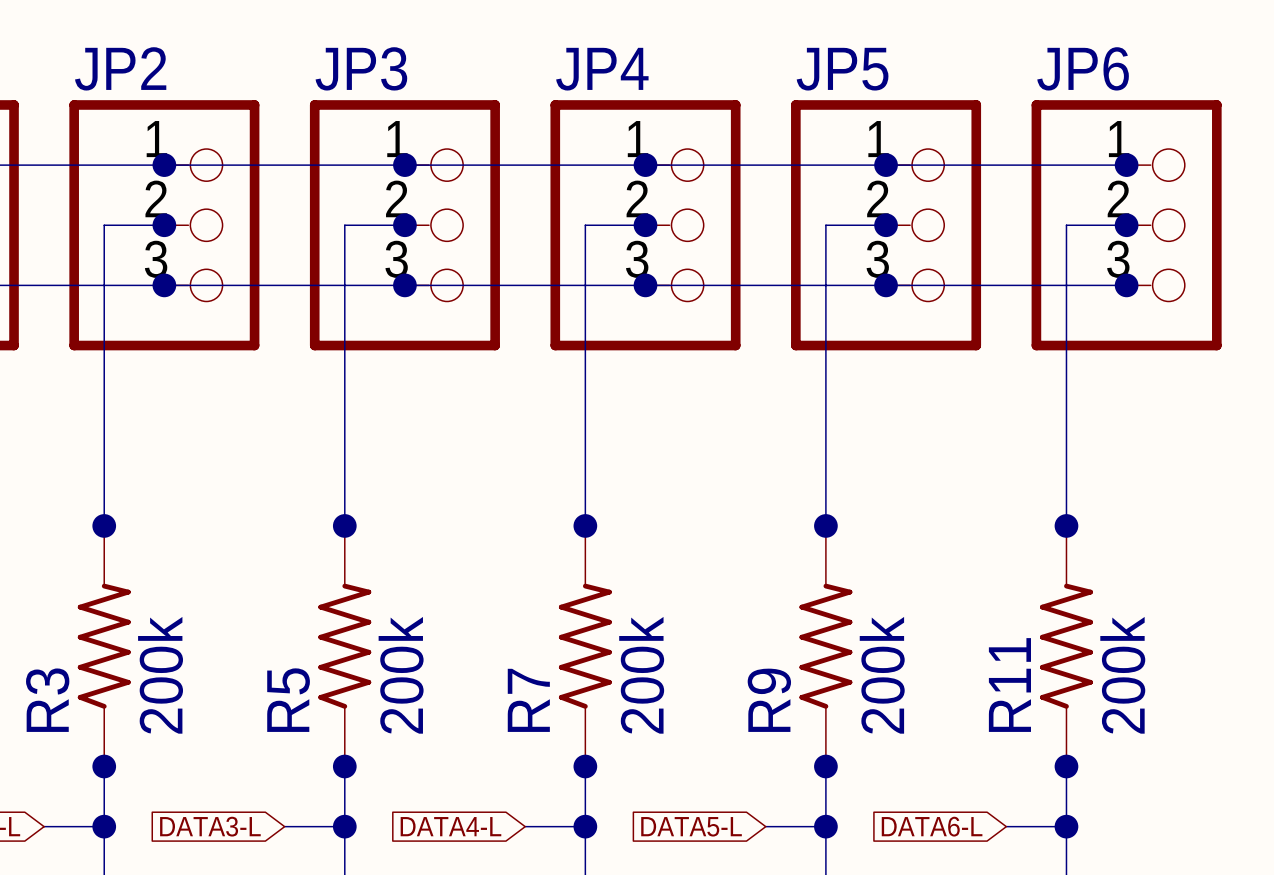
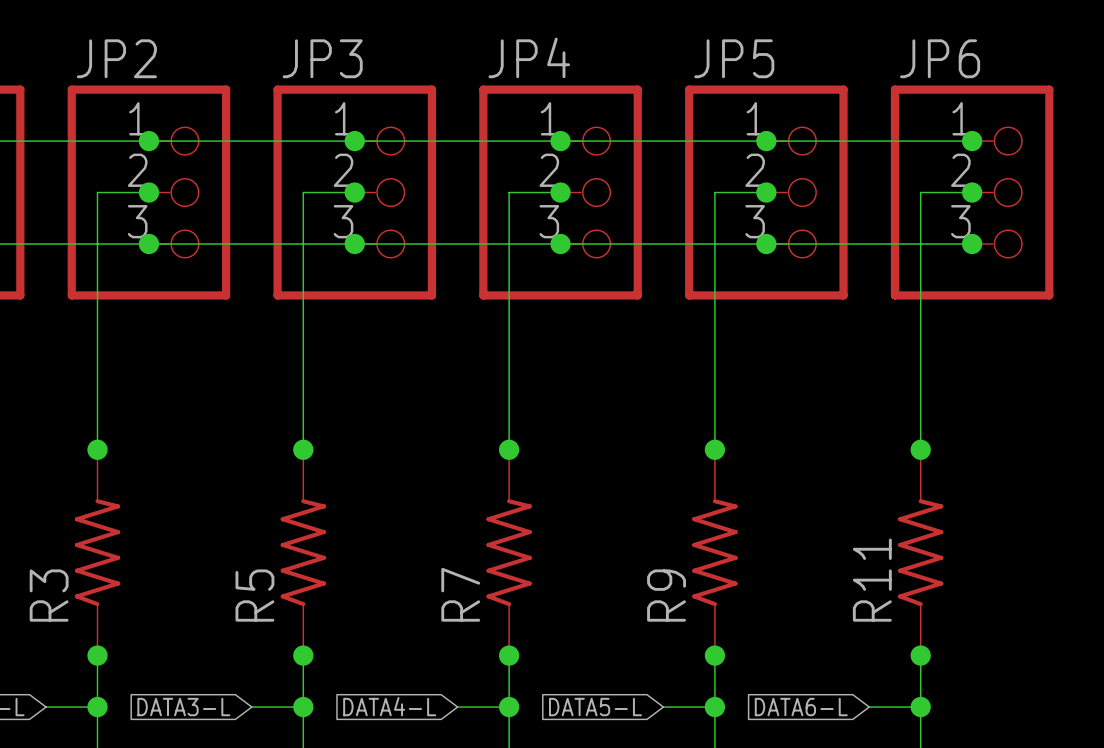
R3 value: 200k (160, 675) -> none
R5 value: 200k (401, 675) -> none
R7 value: 200k (641, 675) -> none
R9 value: 200k (882, 675) -> none
R11 value: 200k (1122, 675) -> none

